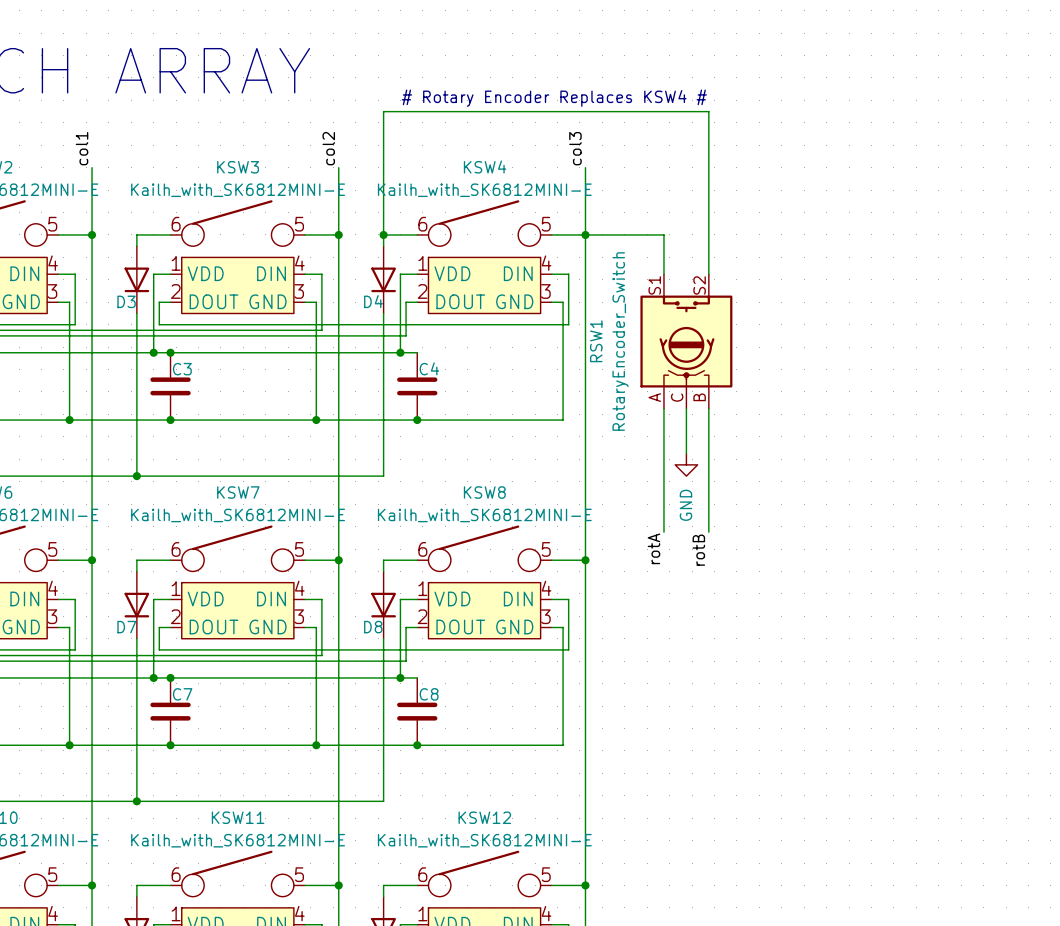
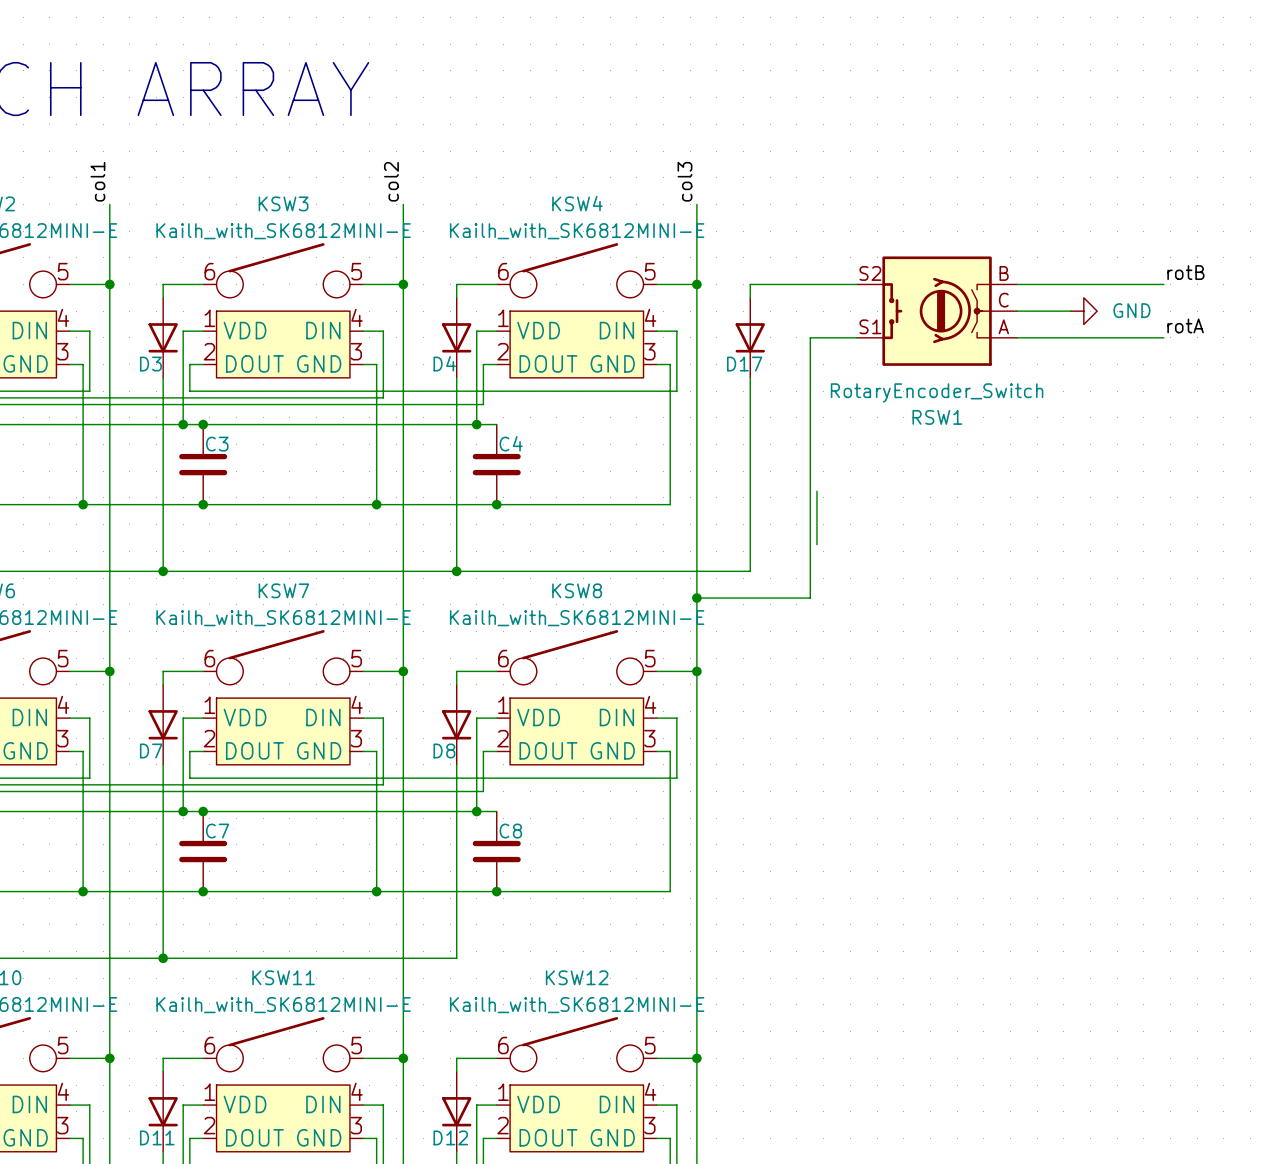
text: # Rotary Encoder Replaces KSW4 # (554, 98) -> none
label: none -> rotB (1185, 272)
wire: (383, 234) (383, 111) (708, 111) (708, 274) -> none
junction: (383, 234) -> none
wire: (585, 234) (630, 234) -> (750, 297) (750, 284)
wire: (663, 234) (663, 274) -> (790, 284) (857, 284)
wire: none -> (1017, 284) (1163, 284)
wire: none -> (1017, 311) (1070, 311)
power symbol: none -> GND (1083, 311)
label: none -> rotA (1185, 325)
D17: none -> (750, 337)
wire: none -> (857, 337) (810, 337) (810, 598) (696, 598)
wire: none -> (1017, 337) (1163, 337)
wire: none -> (750, 377) (750, 571) (456, 571)
RSW1 rotation: 0° (686, 341) -> 90° counterclockwise (937, 311)
RSW1 position: (686, 341) -> (937, 311)
wire: (663, 408) (663, 532) -> none
wire: (708, 408) (708, 532) -> none
power symbol: GND (686, 464) -> none
junction: none -> (456, 571)
junction: none -> (696, 598)
label: rotA (653, 548) -> none
label: rotB (698, 550) -> none

